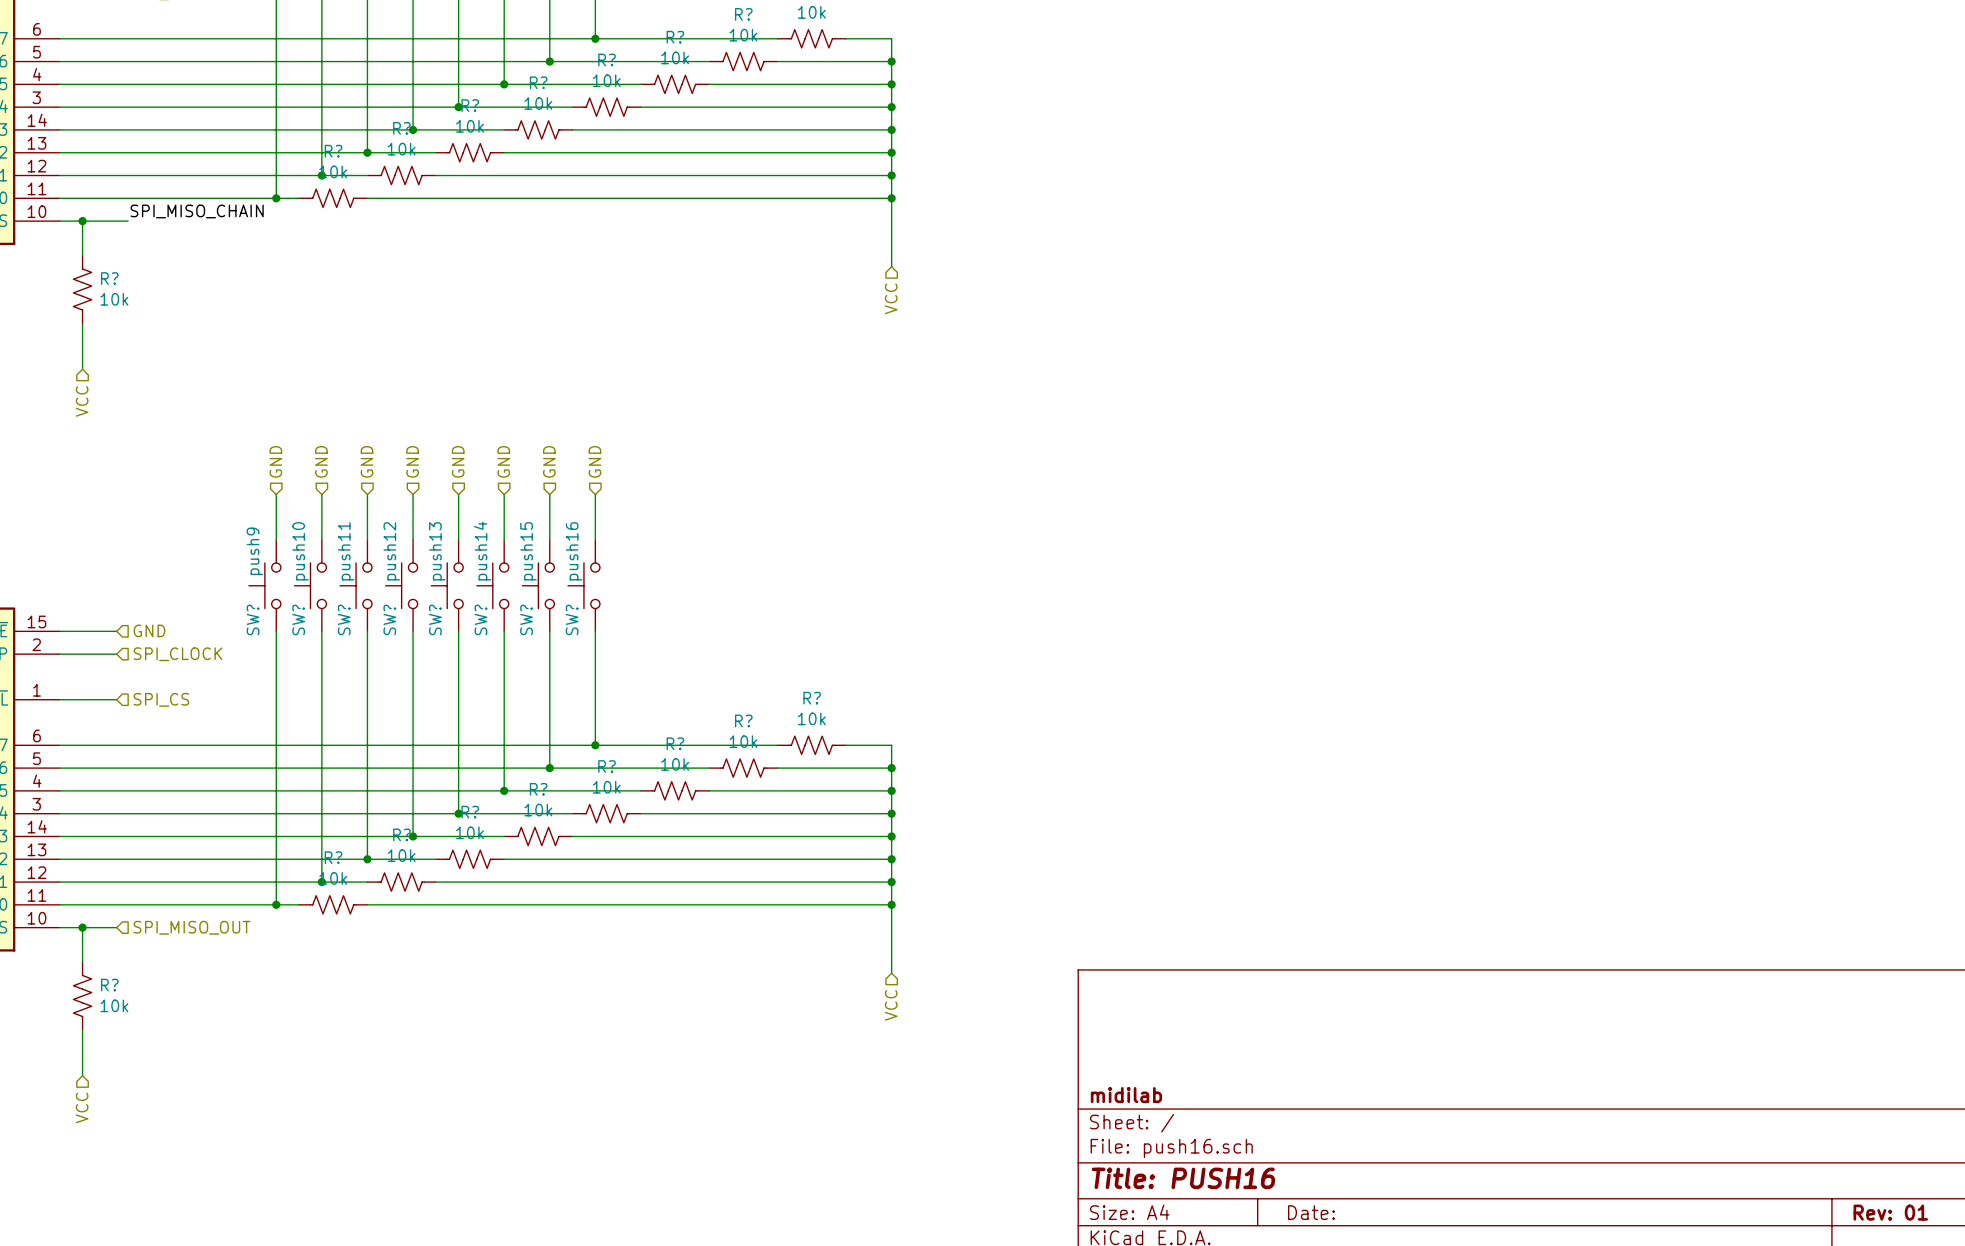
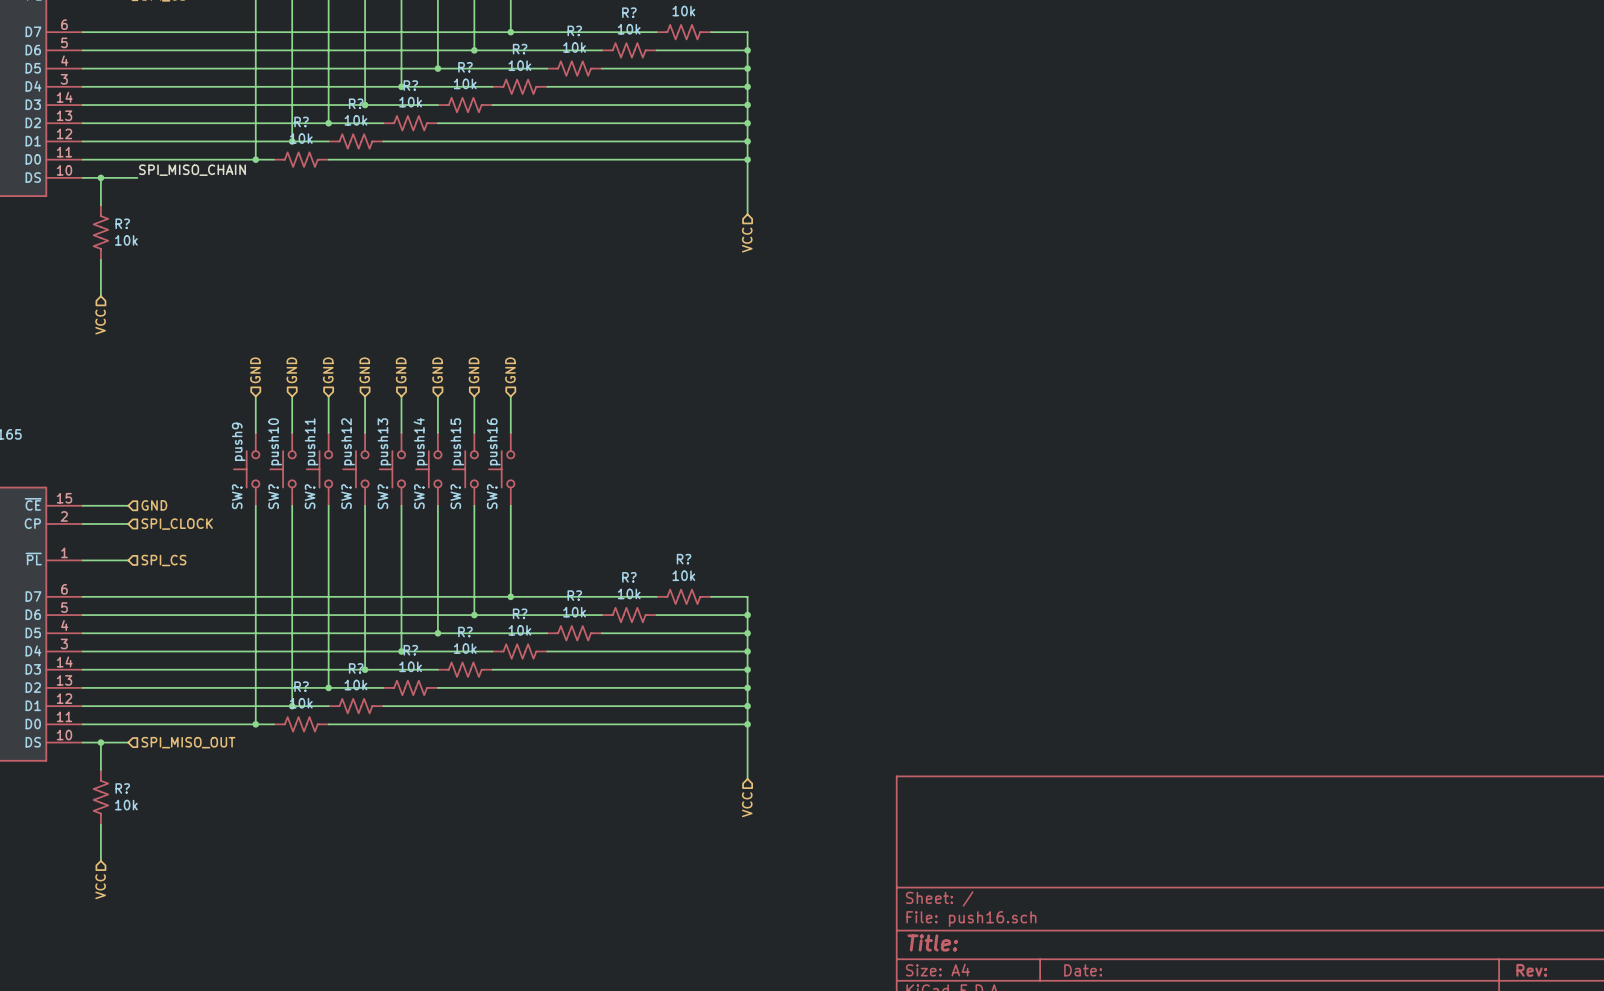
title block: midilab (1126, 1095) -> none
title block: Title: PUSH16 (1183, 1178) -> Title: (932, 942)
title block: Rev: 01 (1890, 1212) -> Rev: (1531, 970)

